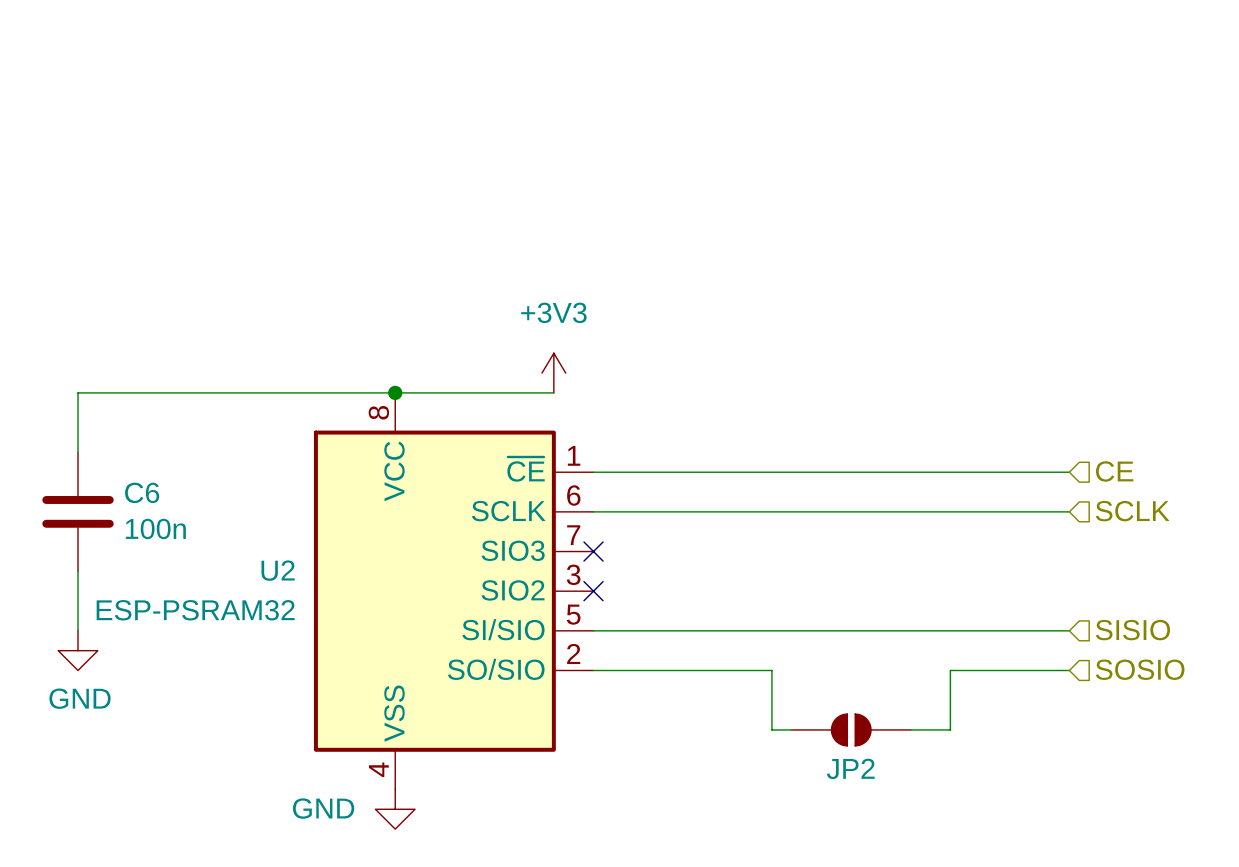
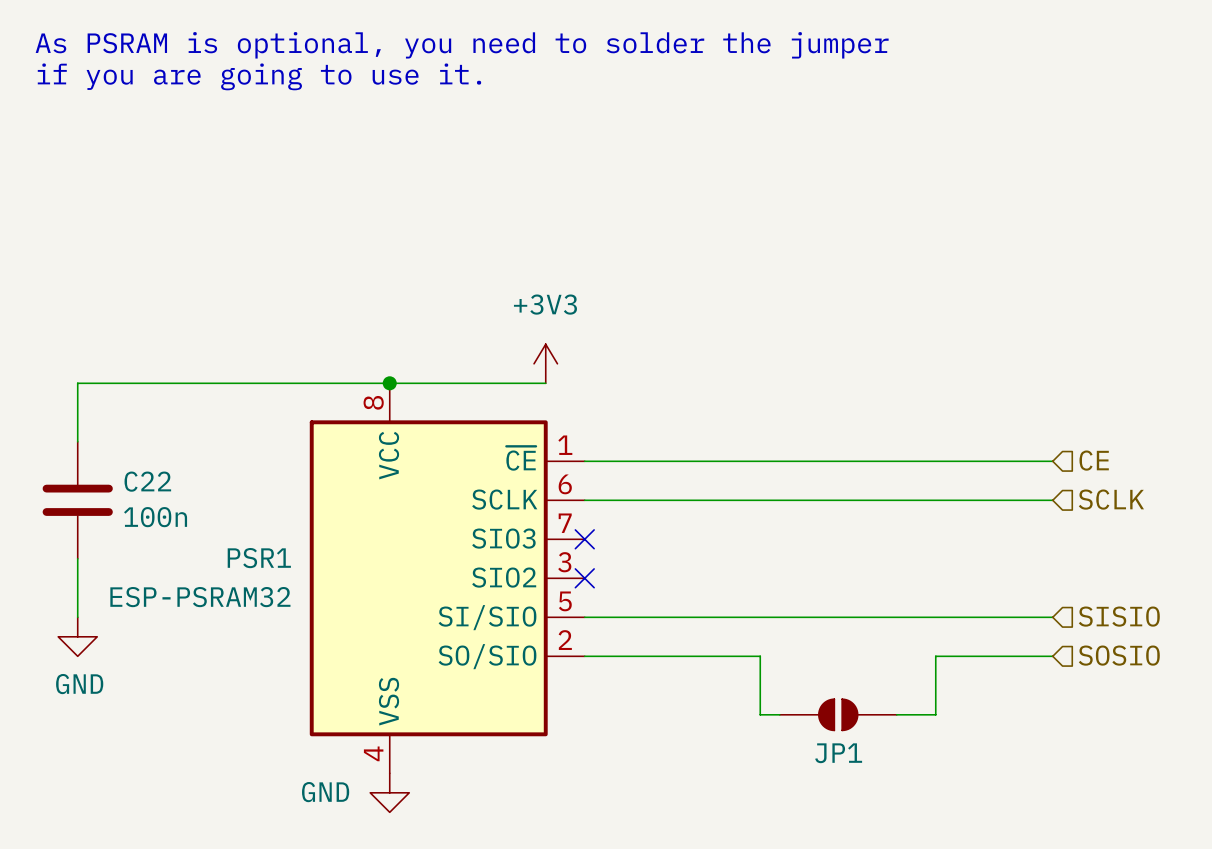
text: none -> As PSRAM is optional, you need to solder the jumper (462, 45)
text: none -> if you are going to use it. (259, 76)
C6 name: C6 (142, 492) -> C22 (147, 481)
U2 name: U2 (278, 570) -> PSR1 (259, 558)
JP2 name: JP2 (850, 768) -> JP1 (838, 753)

